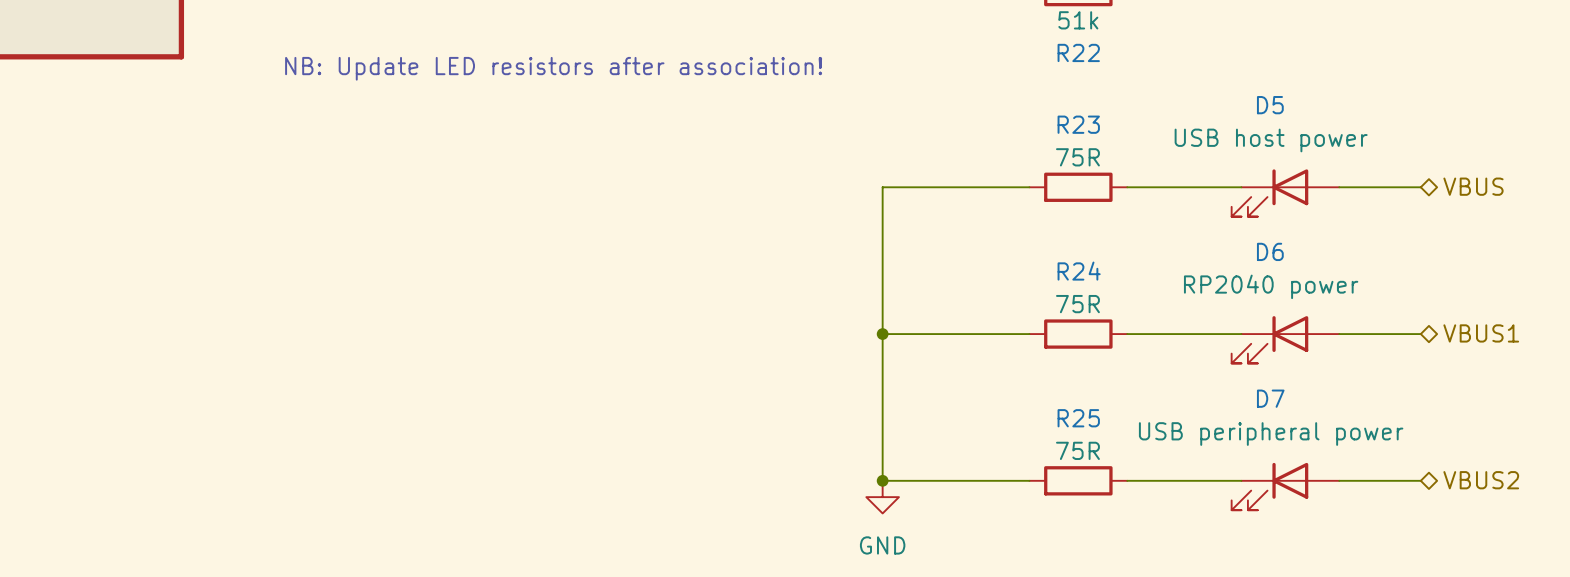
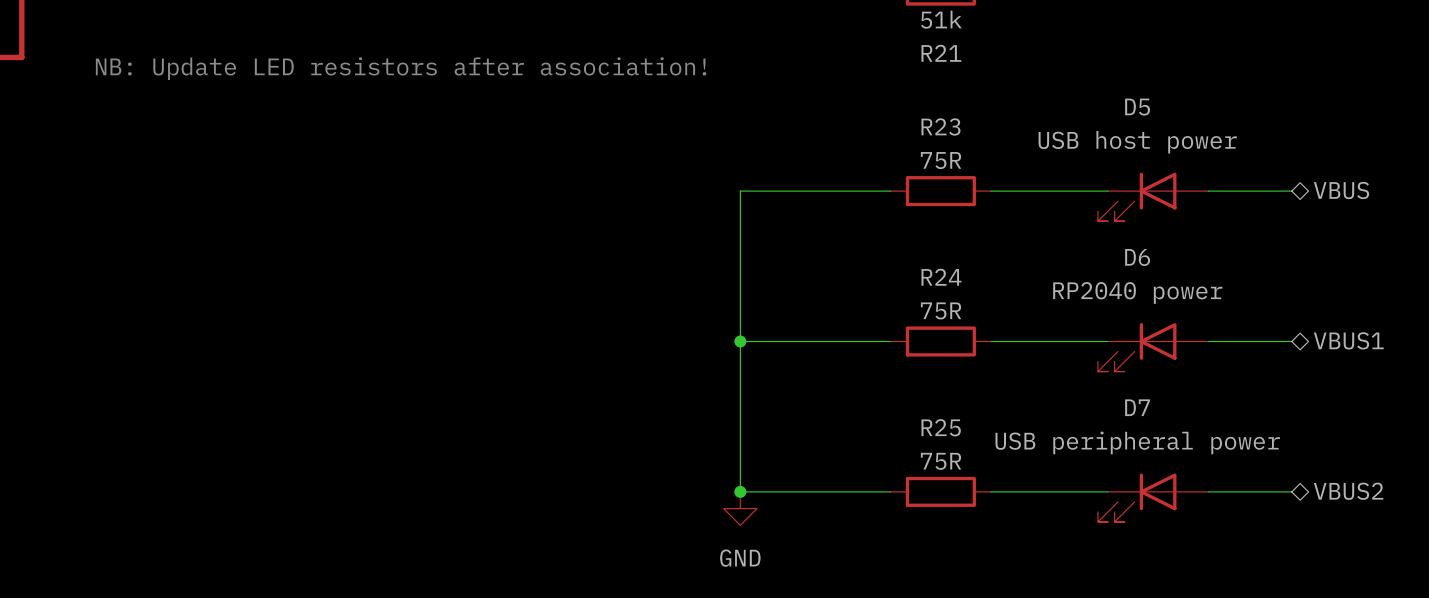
R22 name: R22 (1078, 52) -> R21 (941, 53)

